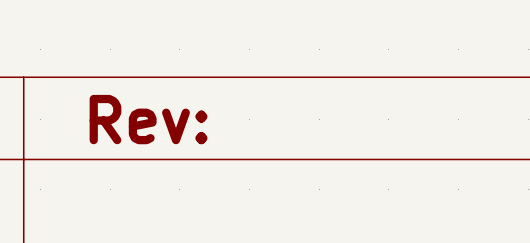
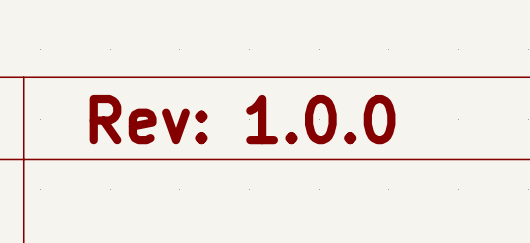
title block: Rev: (148, 119) -> Rev: 1.0.0 (242, 119)

